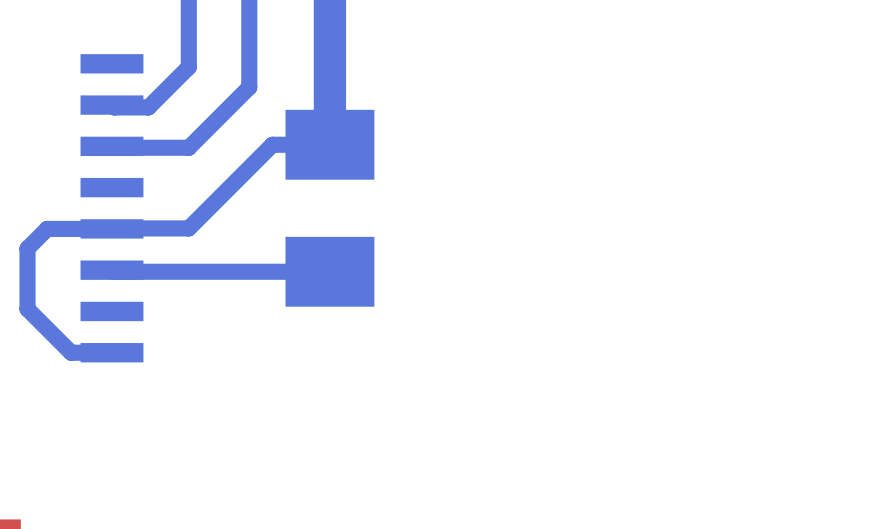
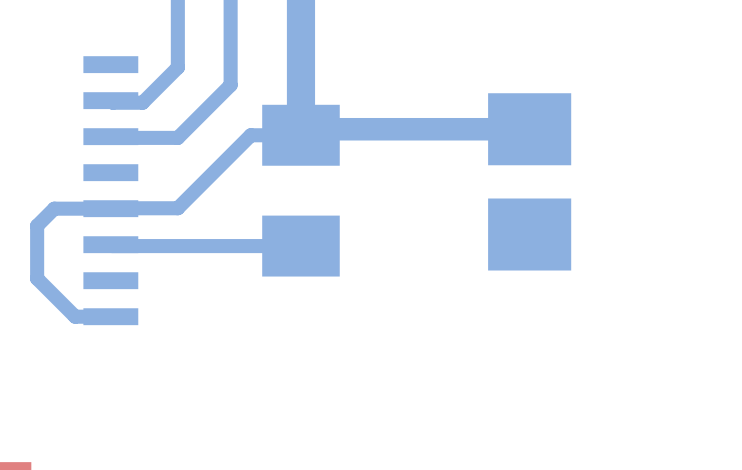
bottom track: none -> (529, 129) (300, 129) (300, 135)
part: none -> (529, 181)

